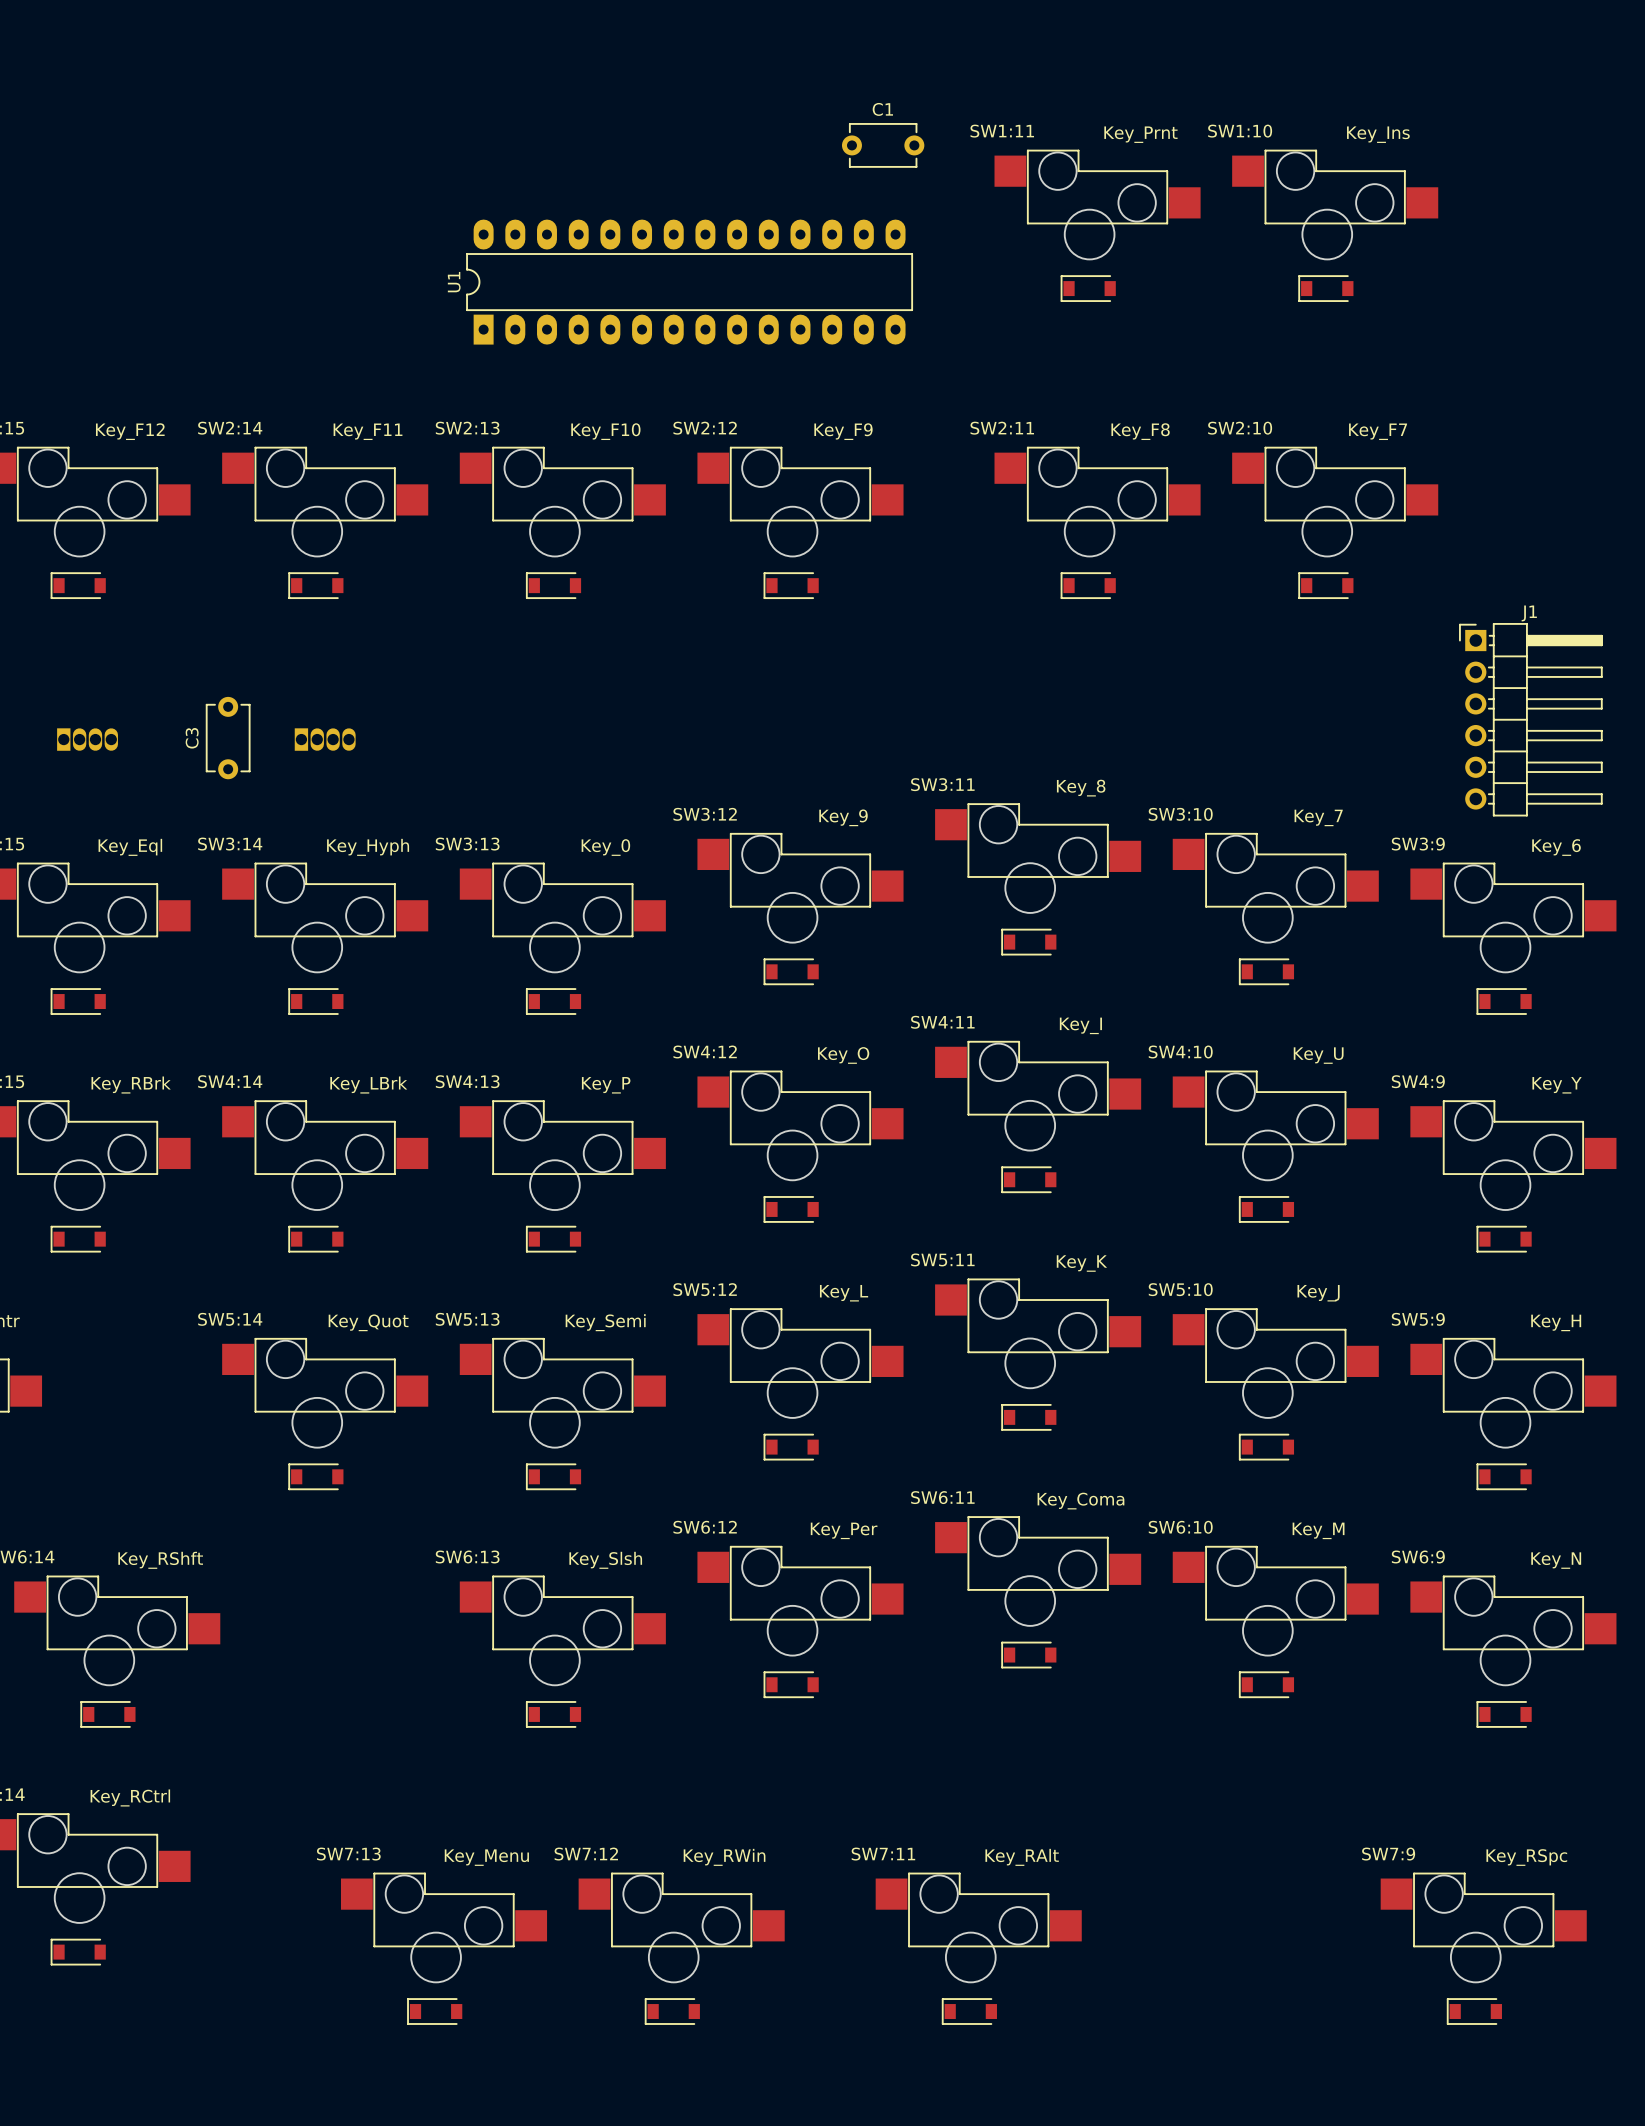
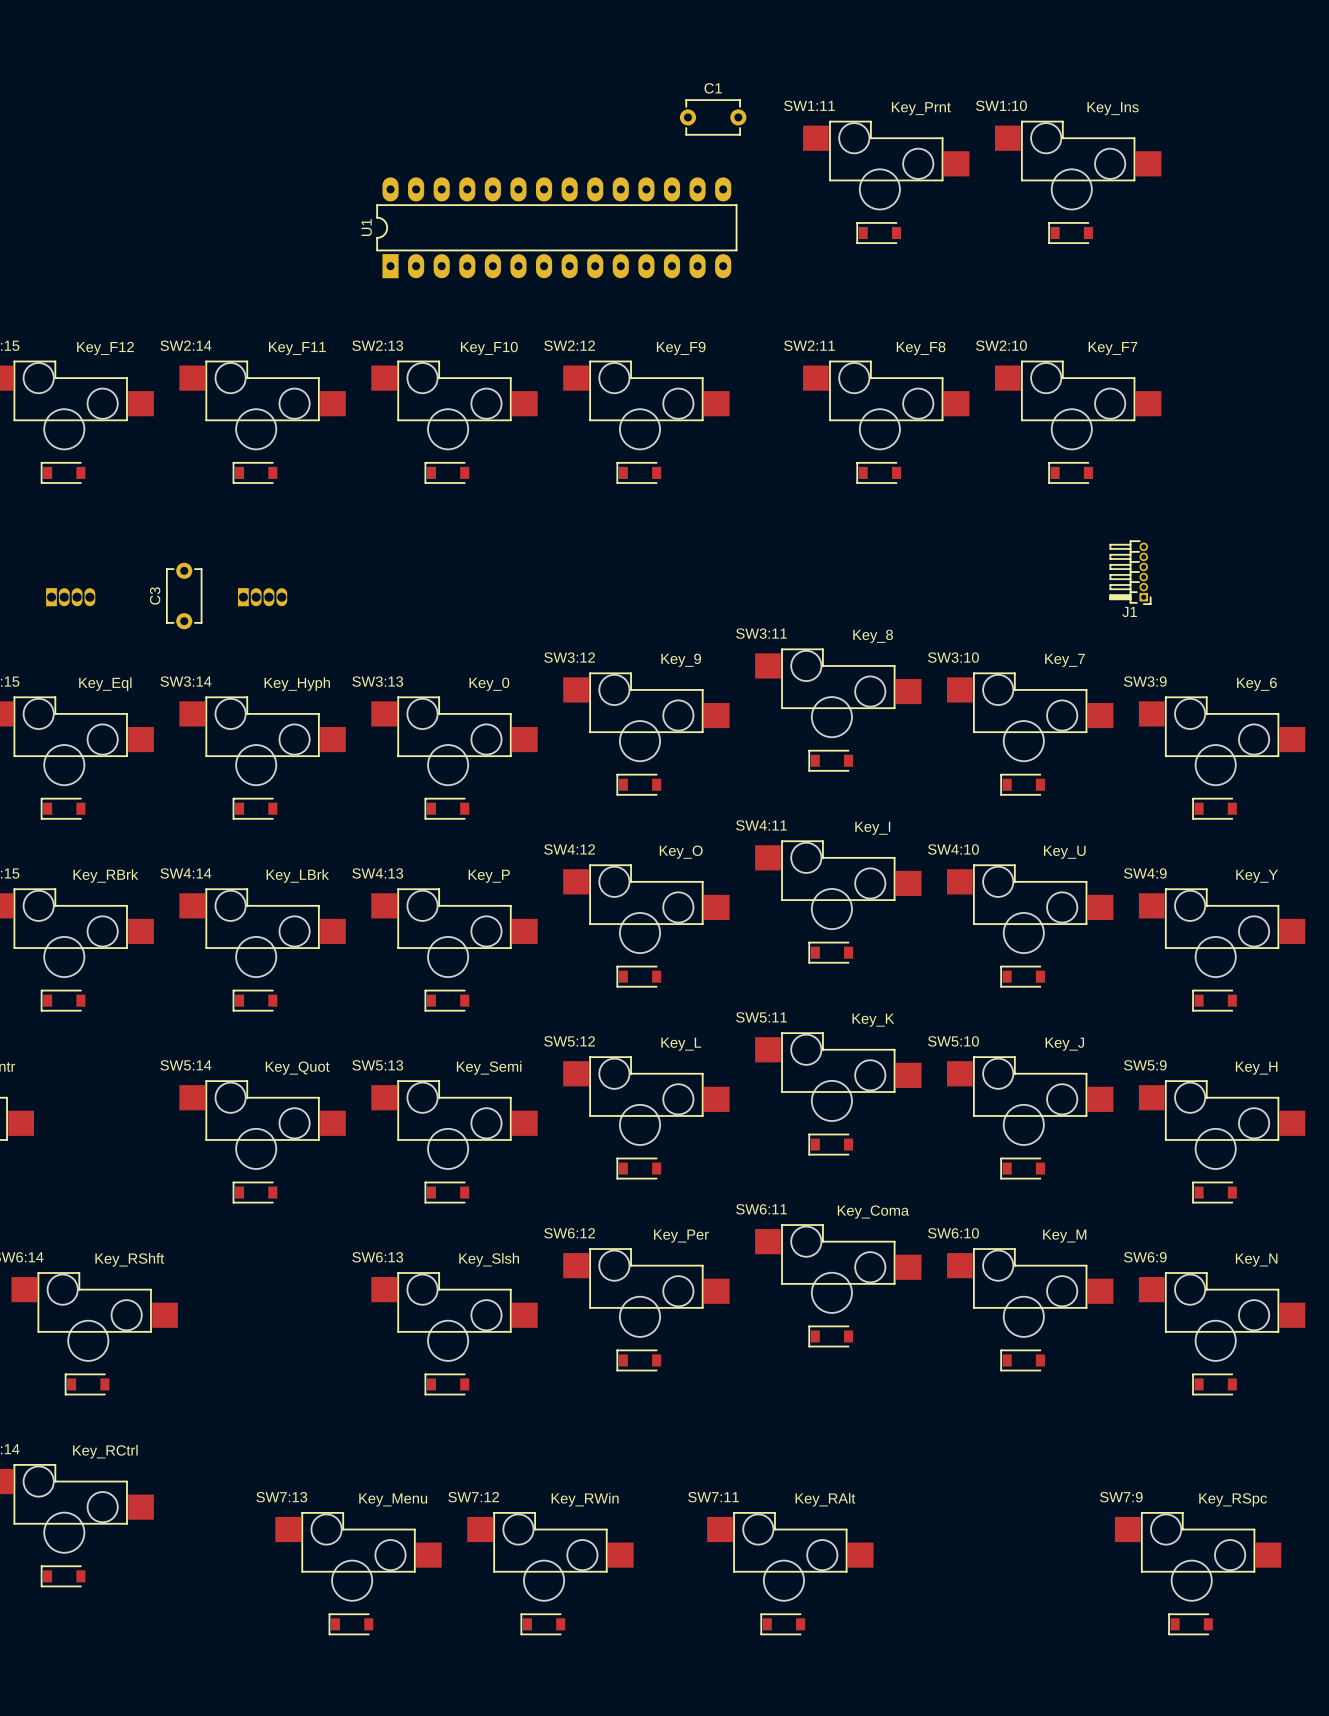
J1 name position: J1 (1529, 613) -> J1 (1129, 612)
J1 footprint: [1459, 623, 1603, 817] -> [1109, 540, 1152, 605]

